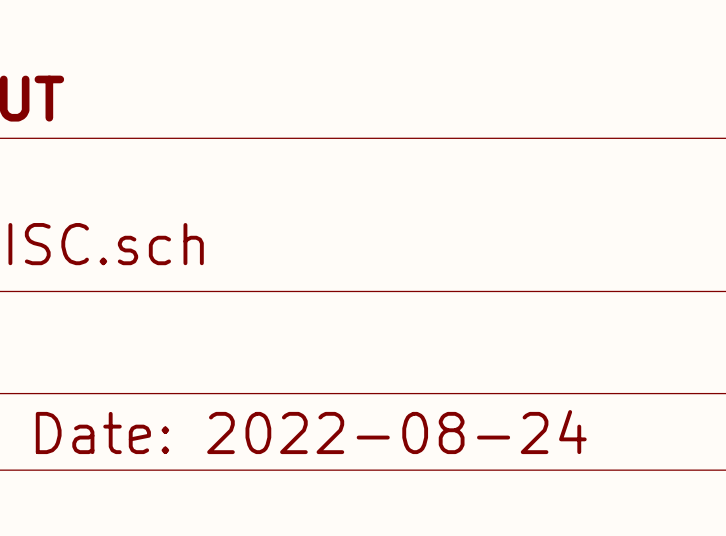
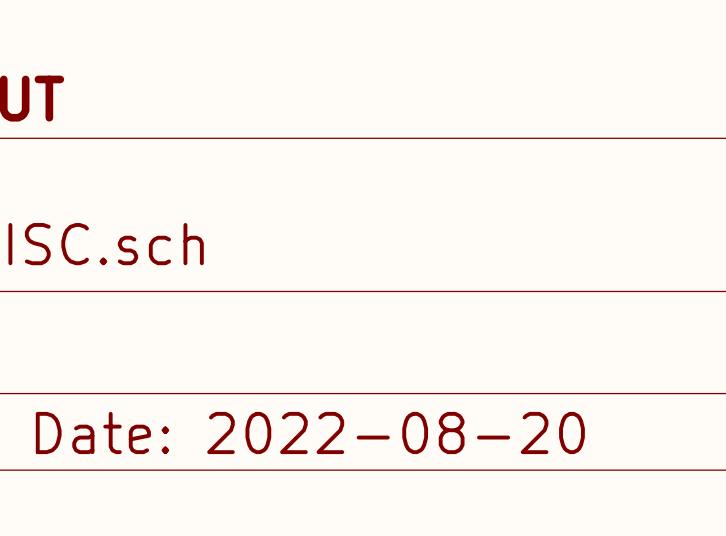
title block: Date: 2022-08-24 (311, 432) -> Date: 2022-08-20 (310, 432)

